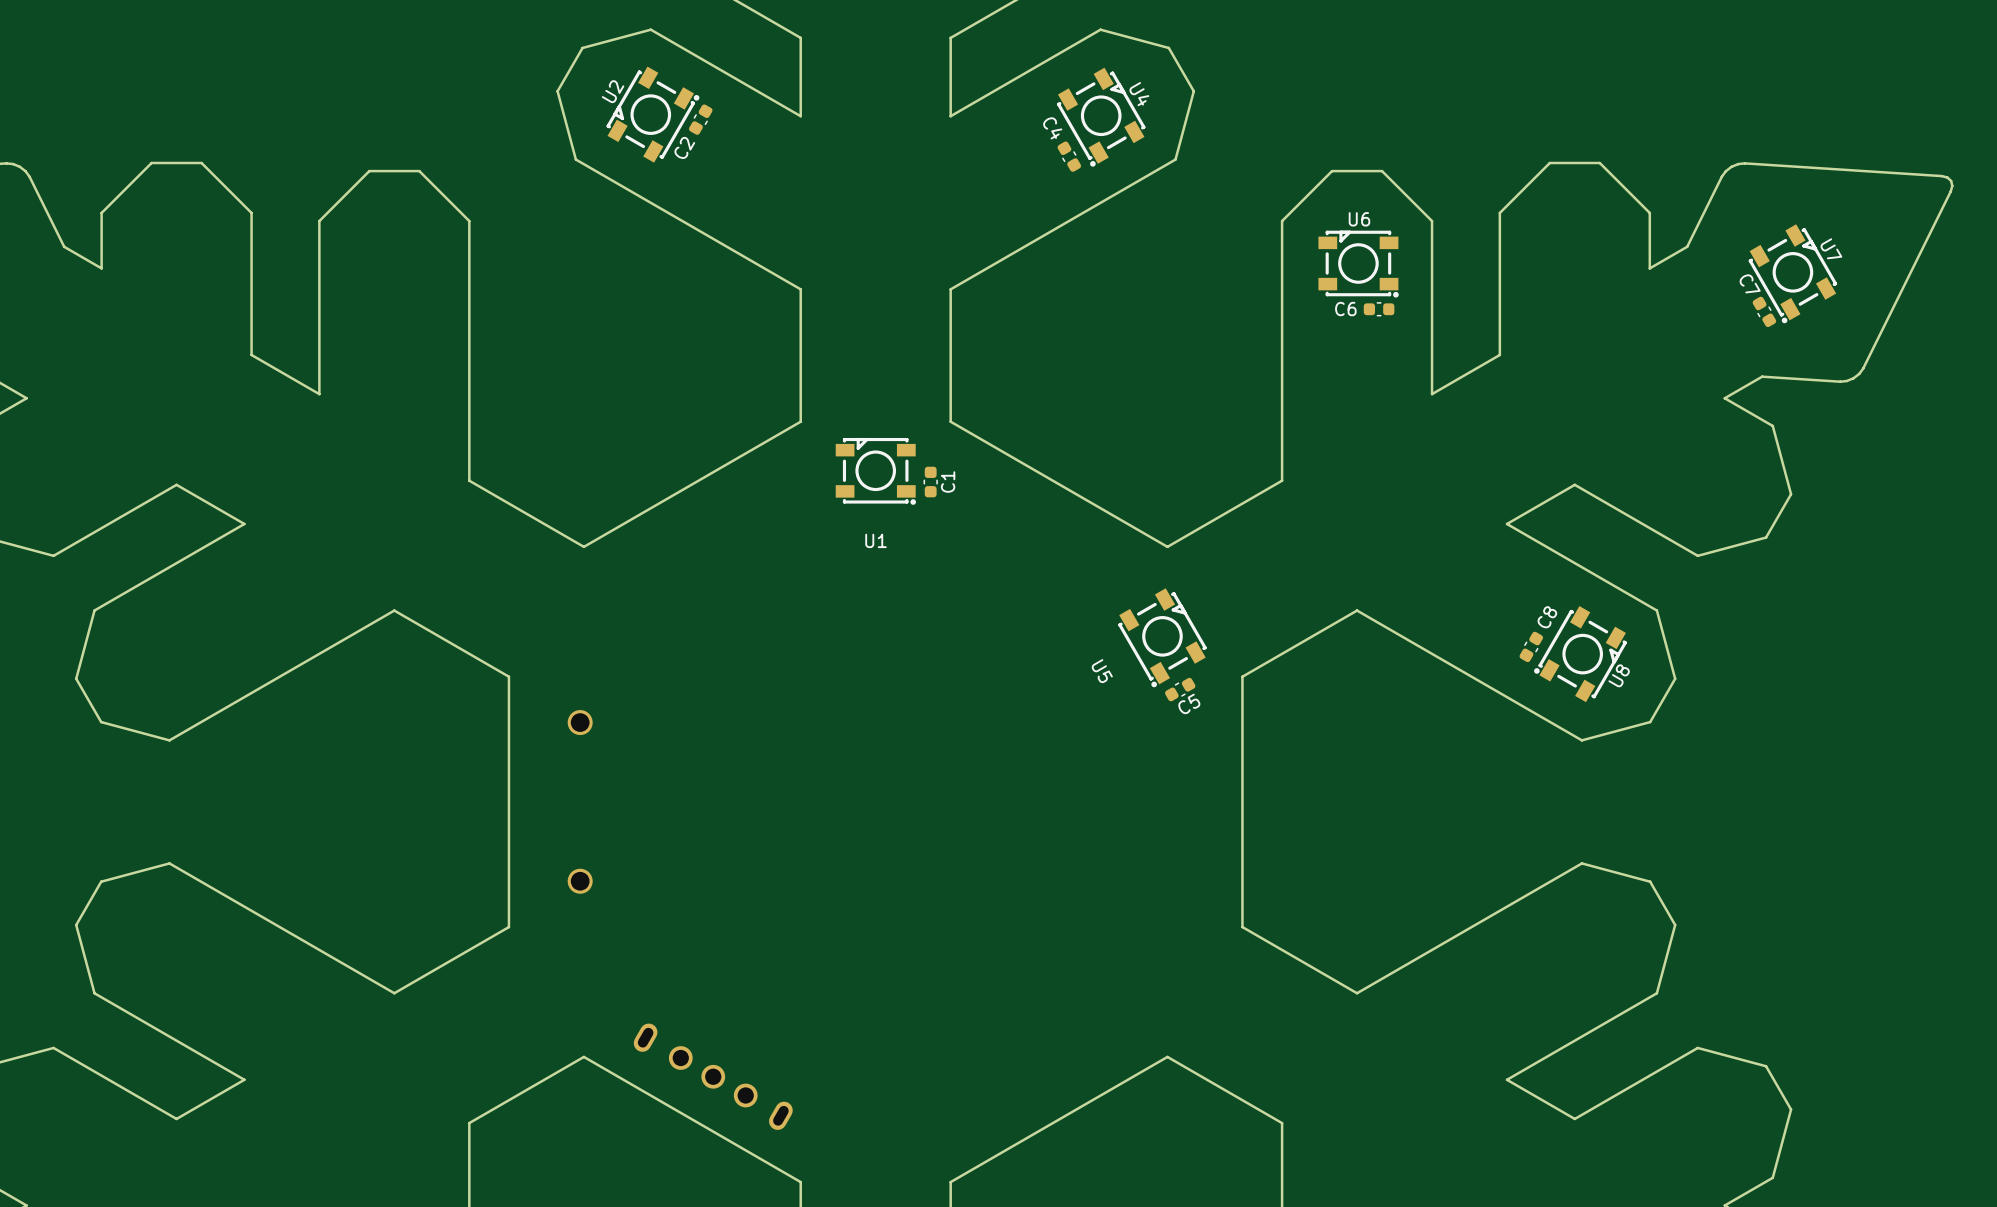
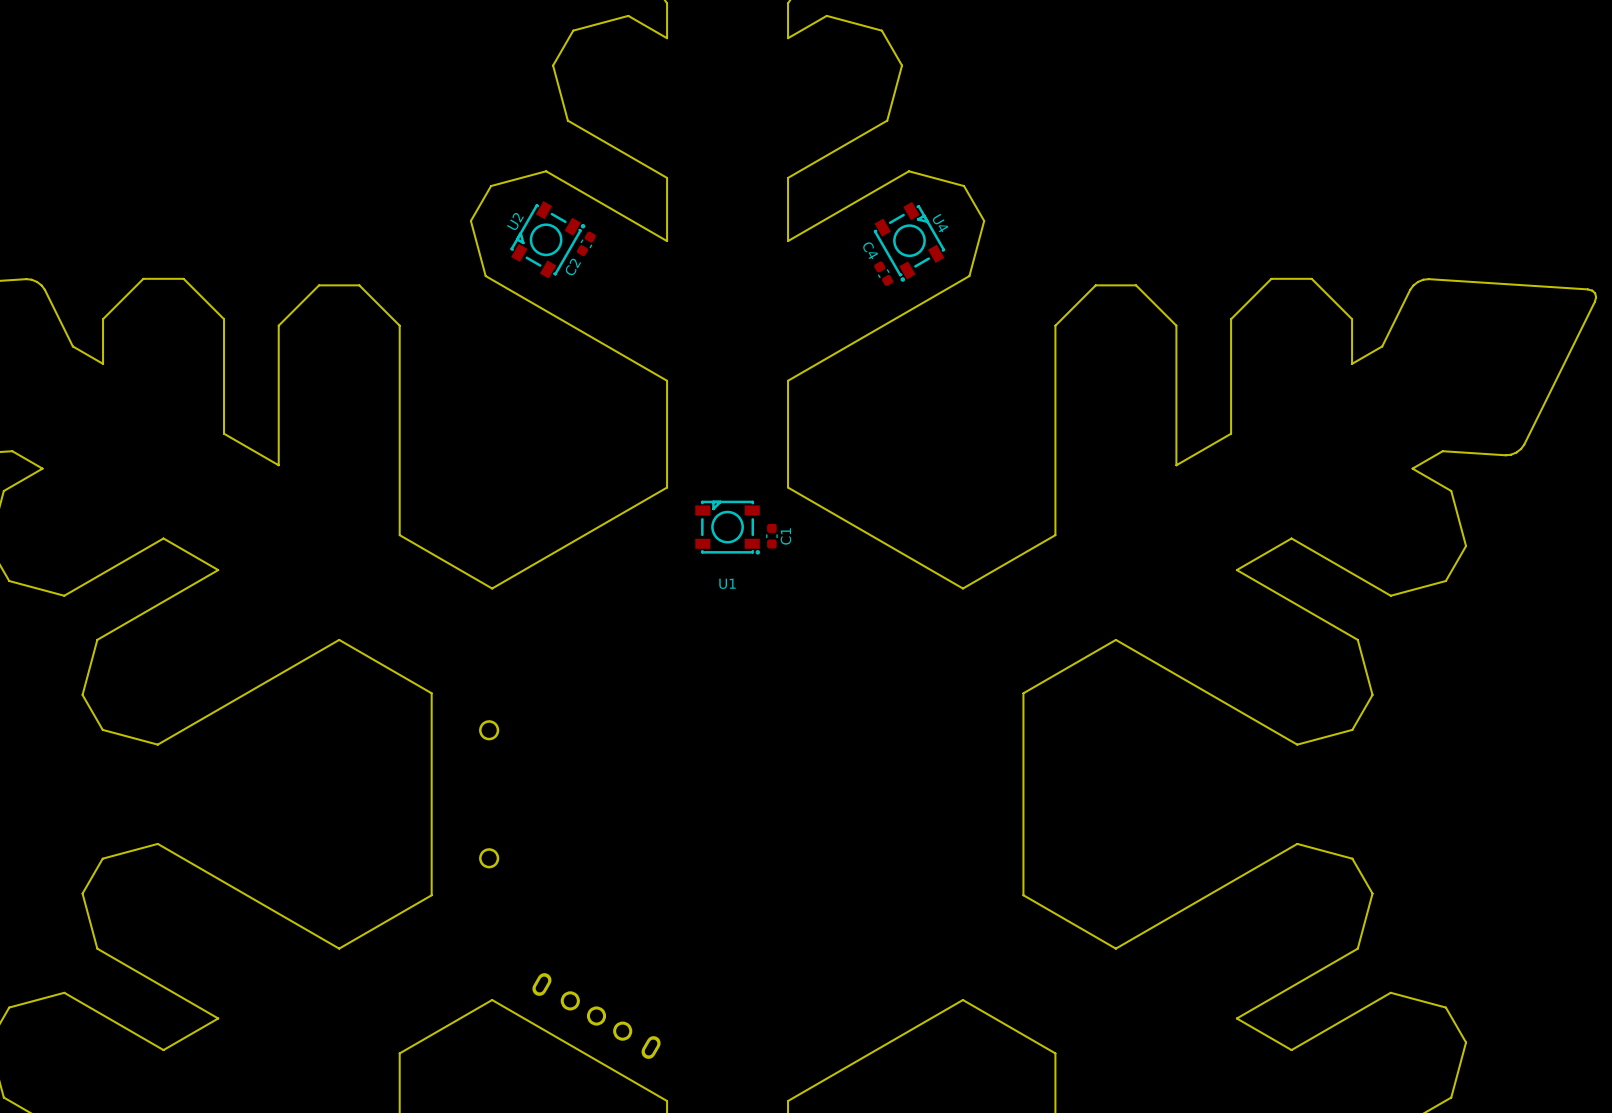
U6: (1358, 264) -> none
U7: (1792, 273) -> none
C6: (1379, 309) -> none
C7: (1764, 311) -> none
U5: (1162, 637) -> none
C8: (1531, 646) -> none
U8: (1580, 654) -> none
C5: (1180, 689) -> none

